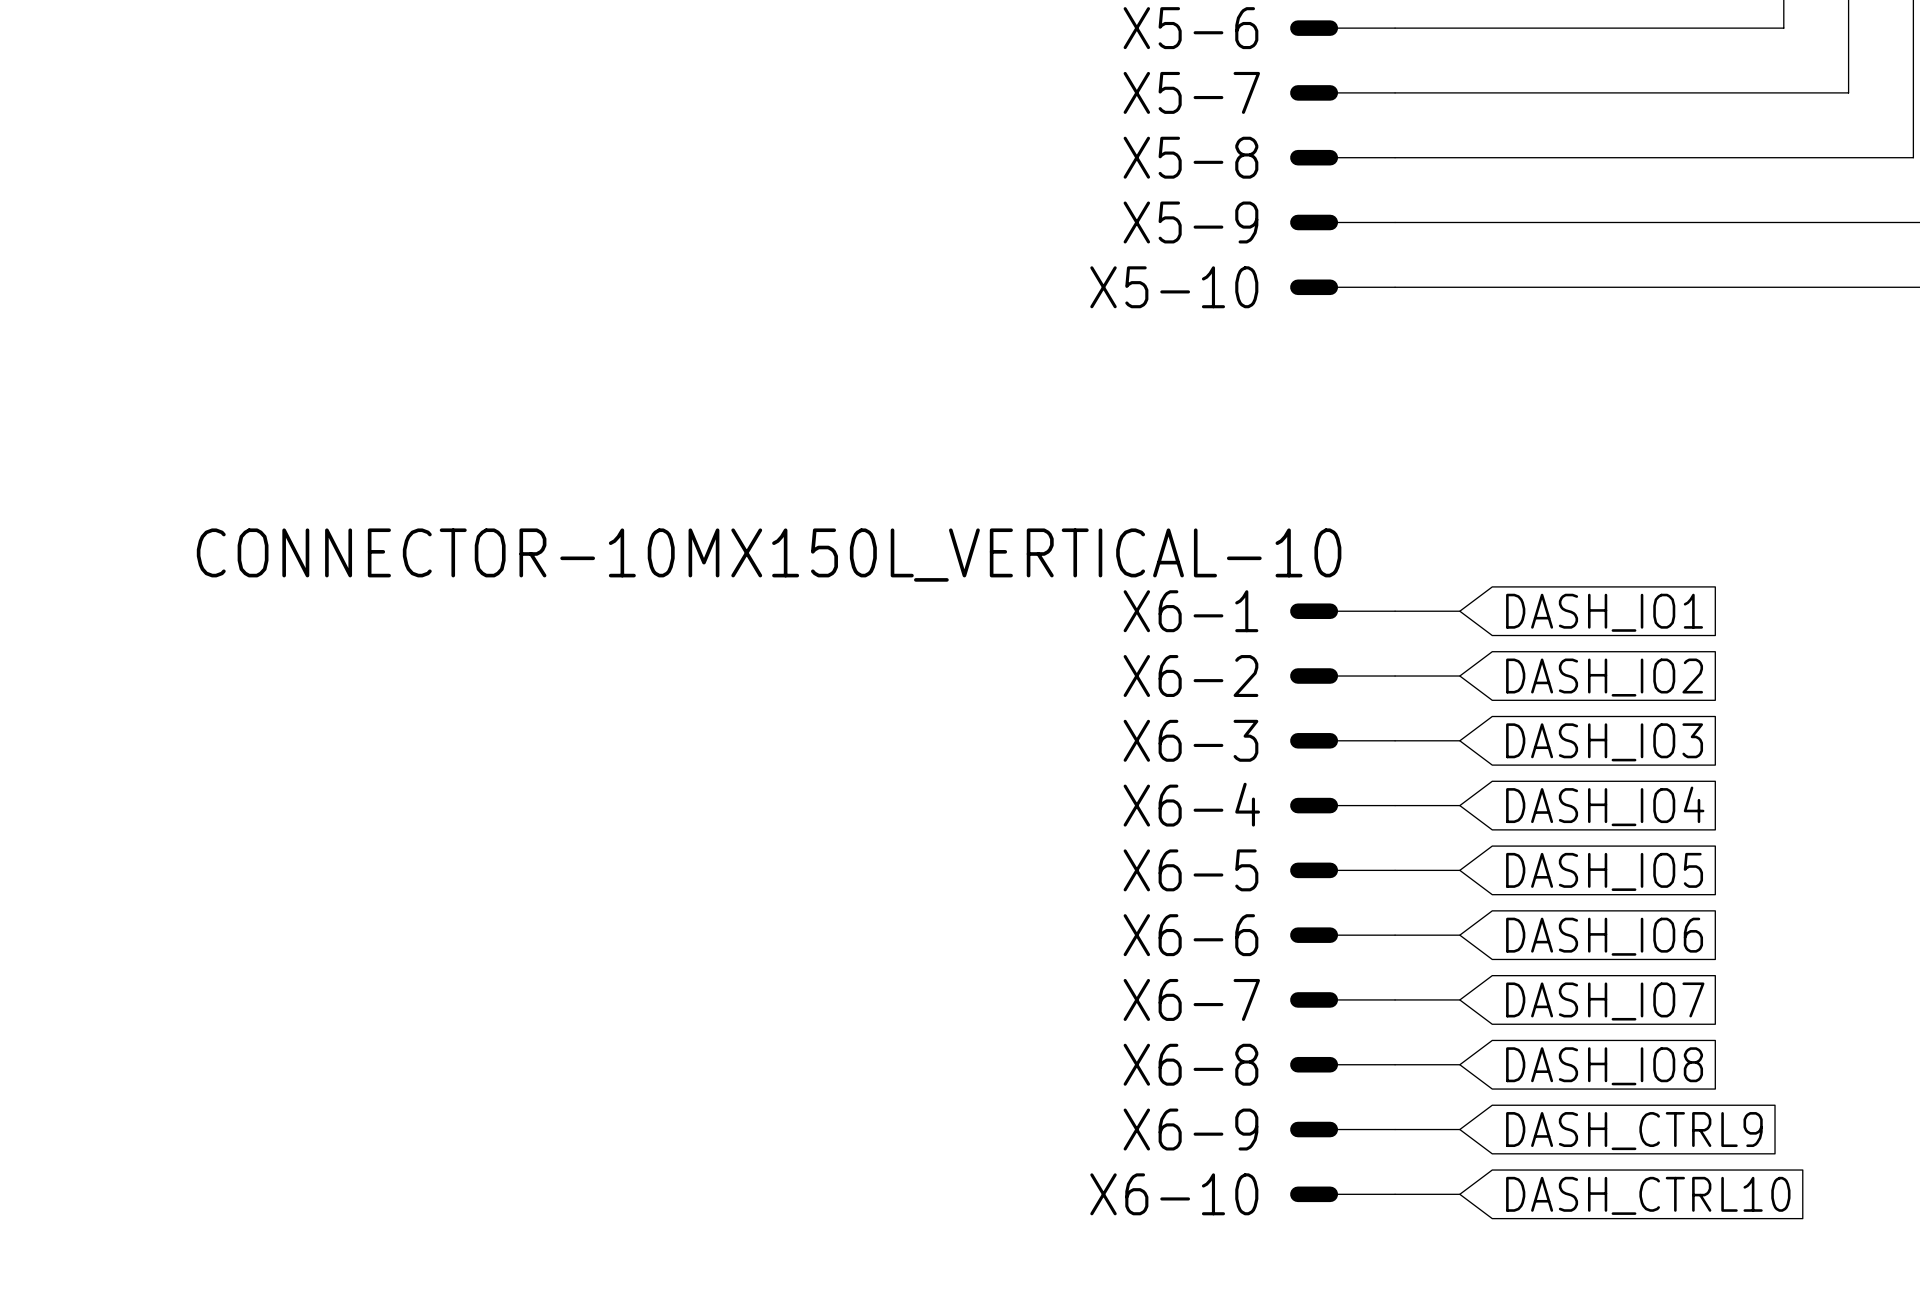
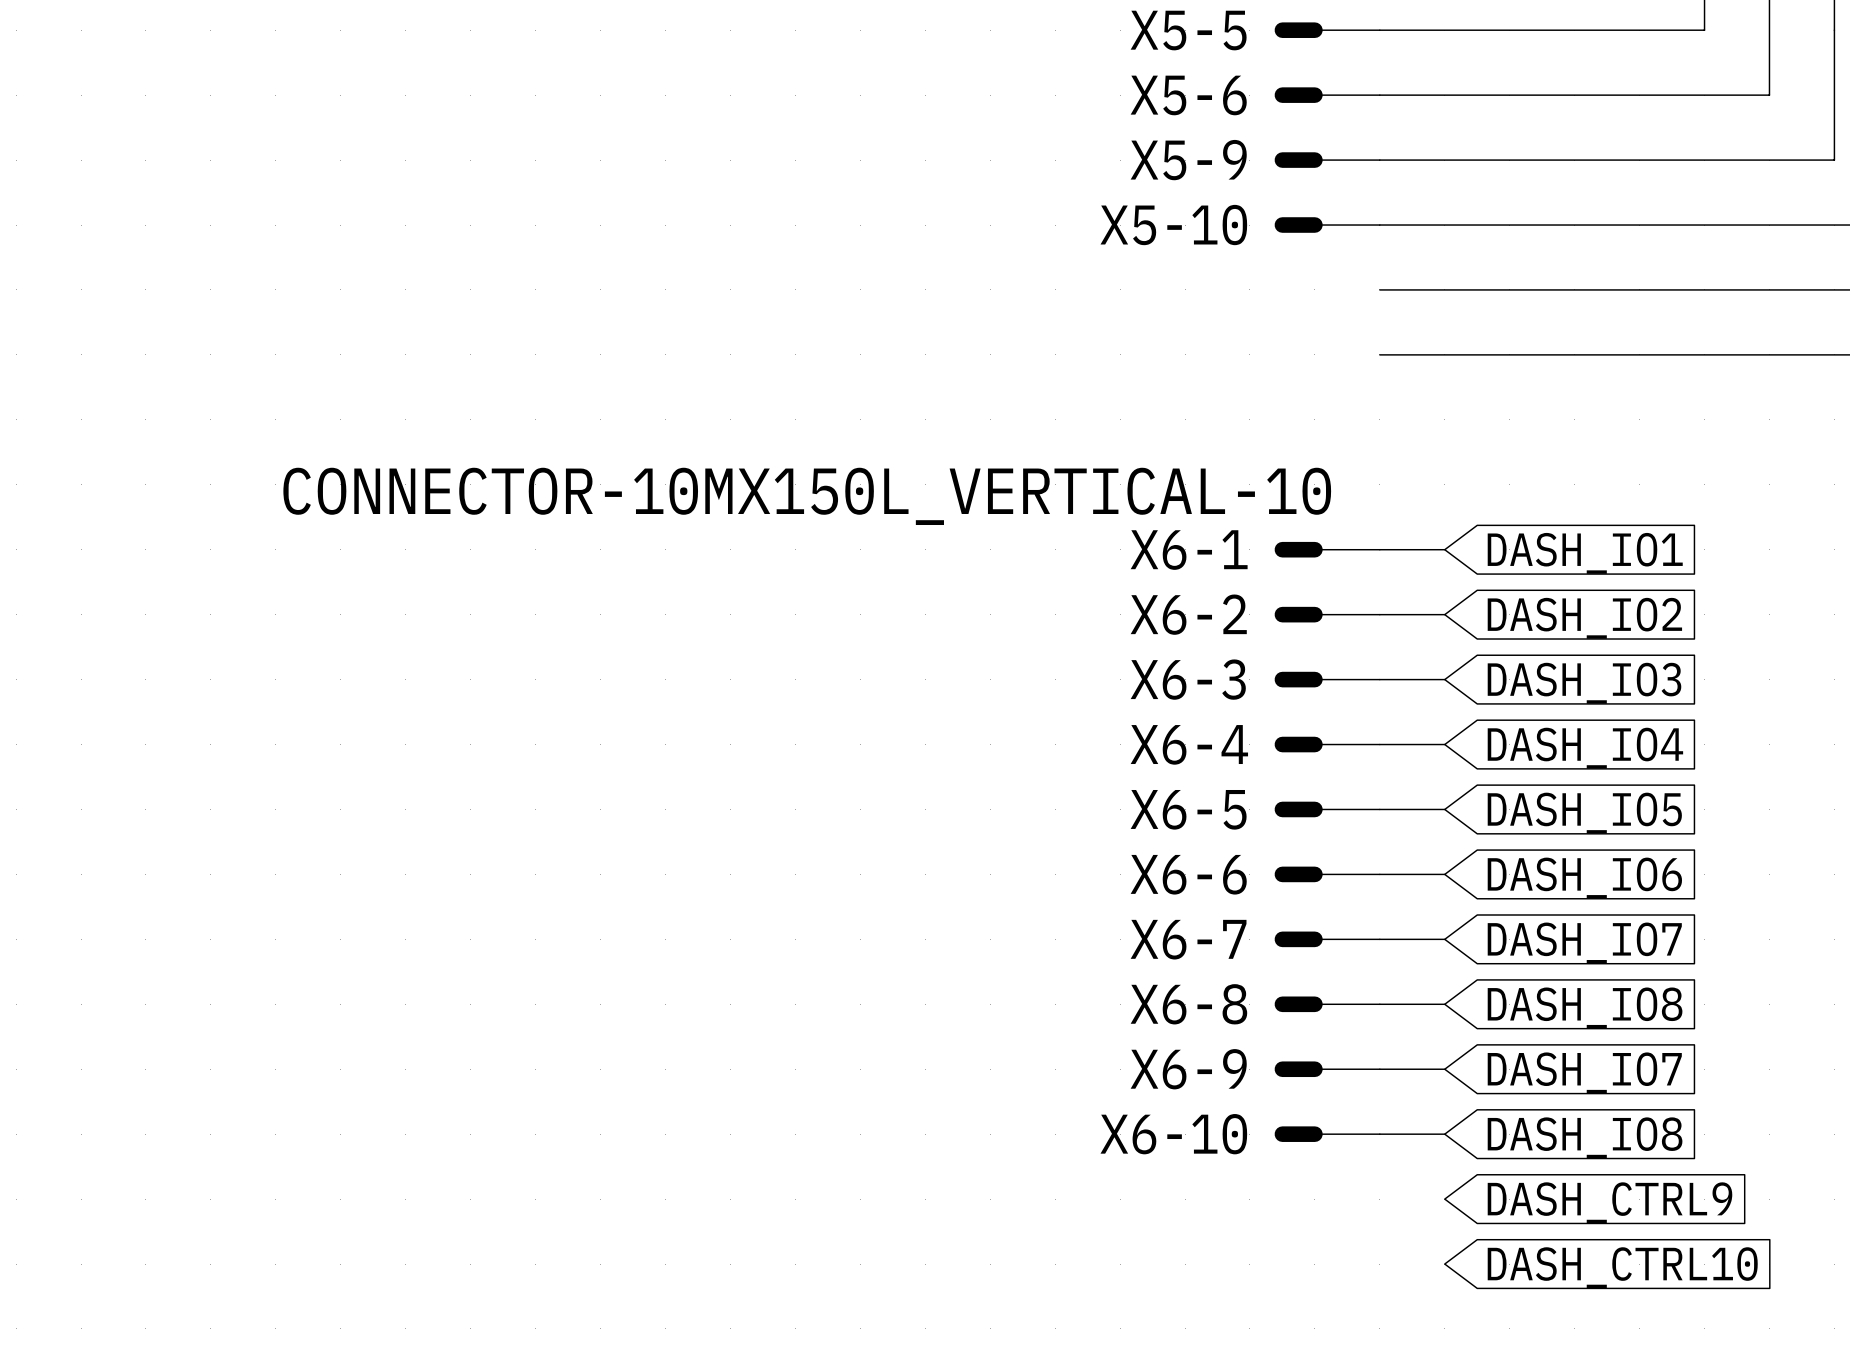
X5-7 name: X5-7 (1191, 92) -> X5-9 (1188, 160)
X5-8 name: X5-8 (1190, 157) -> X5-10 (1173, 225)
X5-9: (1342, 222) -> none
X5-10: (1342, 287) -> none
X6-1: none -> CONNECTOR-10MX150L_VERTICAL-10 (1327, 549)
wire: none -> (1379, 549) (1444, 549)
global label: none -> DASH_IO1 (1585, 553)
X6-2: none -> (1327, 614)
global label: none -> DASH_IO2 (1584, 618)
X6-1 value: CONNECTOR-10MX150L_VERTICAL-10 (769, 555) -> none
X6-1 name: X6-1 (1190, 611) -> X6-3 (1188, 679)
global label: DASH_IO1 (1604, 612) -> DASH_IO3 (1584, 683)
X6-2 name: X6-2 (1190, 676) -> X6-4 (1189, 744)
global label: DASH_IO2 (1604, 677) -> DASH_IO4 (1585, 748)
X6-3 name: X6-3 (1190, 740) -> X6-5 (1188, 809)
global label: DASH_IO3 (1604, 742) -> DASH_IO5 (1584, 813)
X6-4 name: X6-4 (1191, 804) -> X6-6 (1188, 874)
global label: DASH_IO4 (1605, 806) -> DASH_IO6 (1584, 878)
X6-5 name: X6-5 (1190, 870) -> X6-7 (1188, 939)
global label: DASH_IO5 (1604, 871) -> DASH_IO7 (1584, 943)
X6-6 name: X6-6 (1190, 935) -> X6-8 (1188, 1004)
global label: DASH_IO6 (1604, 936) -> DASH_IO8 (1585, 1007)
X6-7 name: X6-7 (1191, 999) -> X6-9 (1188, 1069)
X6-8 name: X6-8 (1190, 1064) -> X6-10 (1173, 1134)
X6-9: (1342, 1129) -> none
wire: (1395, 1129) (1459, 1129) -> (1379, 614) (1444, 614)
X6-10: (1342, 1194) -> none
wire: (1395, 1194) (1459, 1194) -> none

